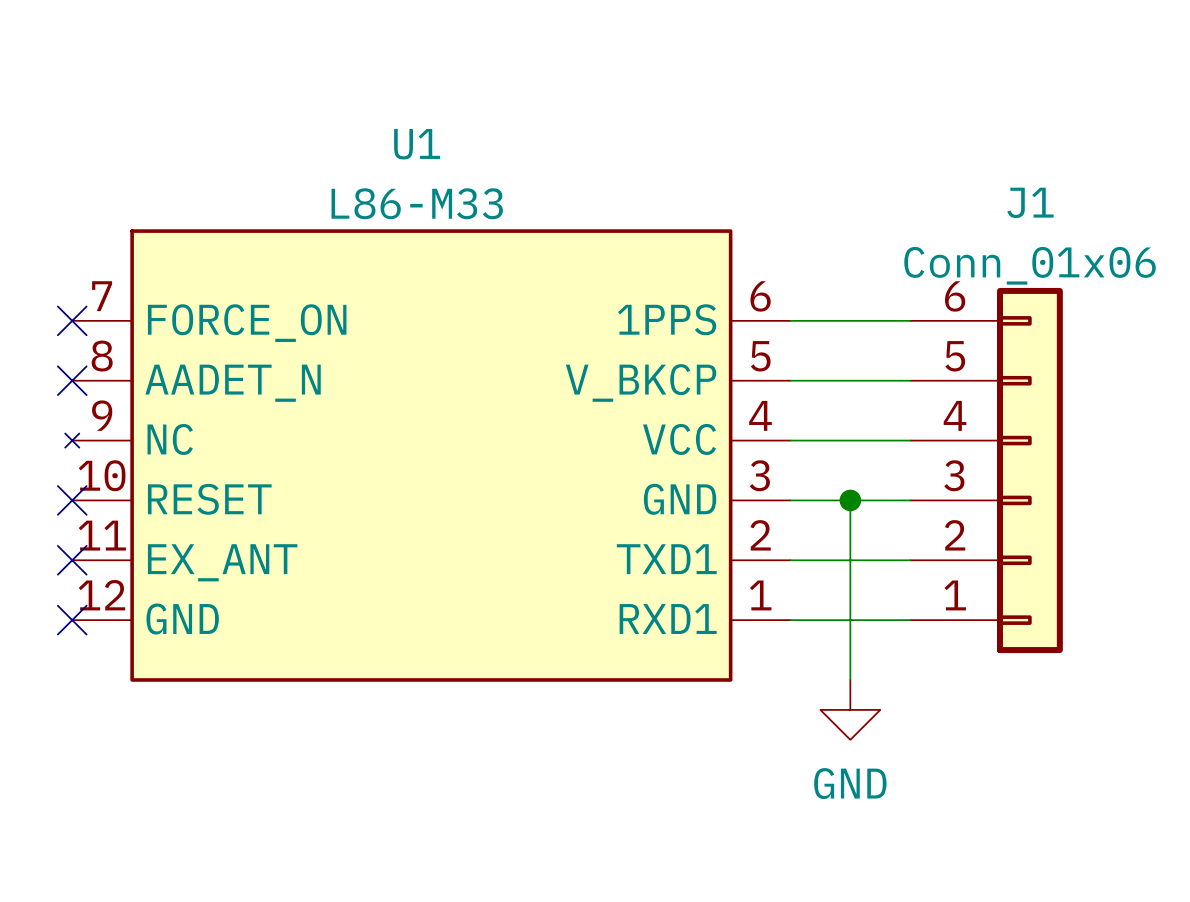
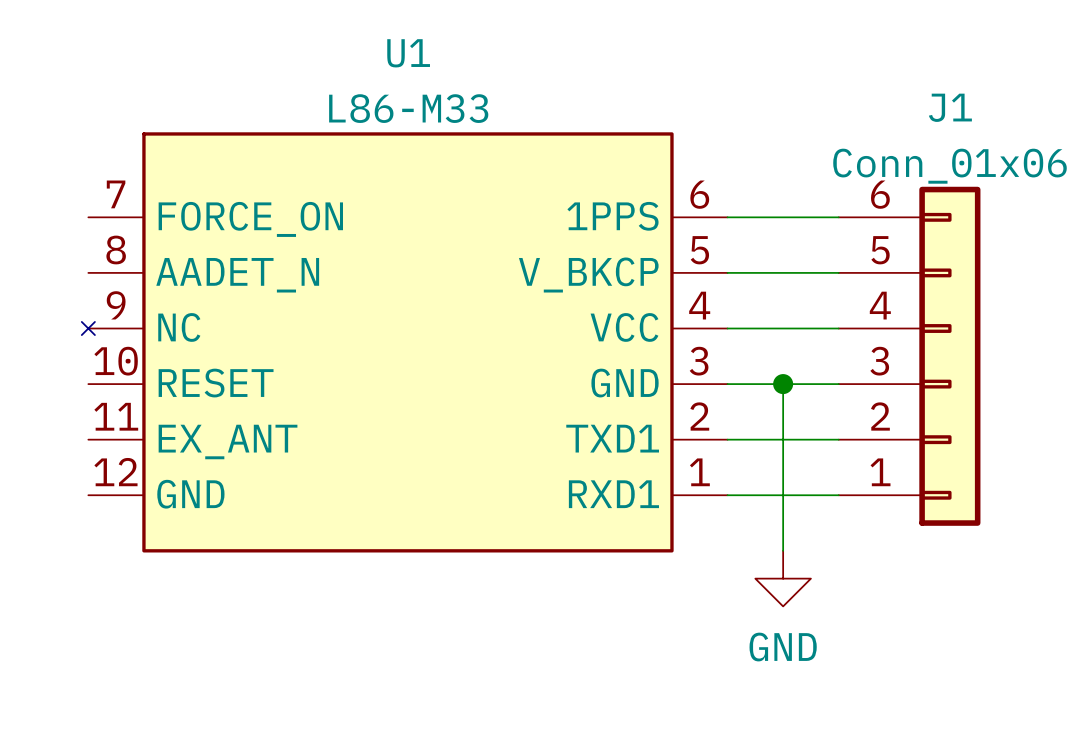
U1 symbol: [65, 229, 791, 682] -> [81, 132, 728, 553]
no-connect mark: (72, 320) -> none
no-connect mark: (72, 380) -> none
no-connect mark: (72, 500) -> none
no-connect mark: (72, 560) -> none
no-connect mark: (72, 620) -> none

